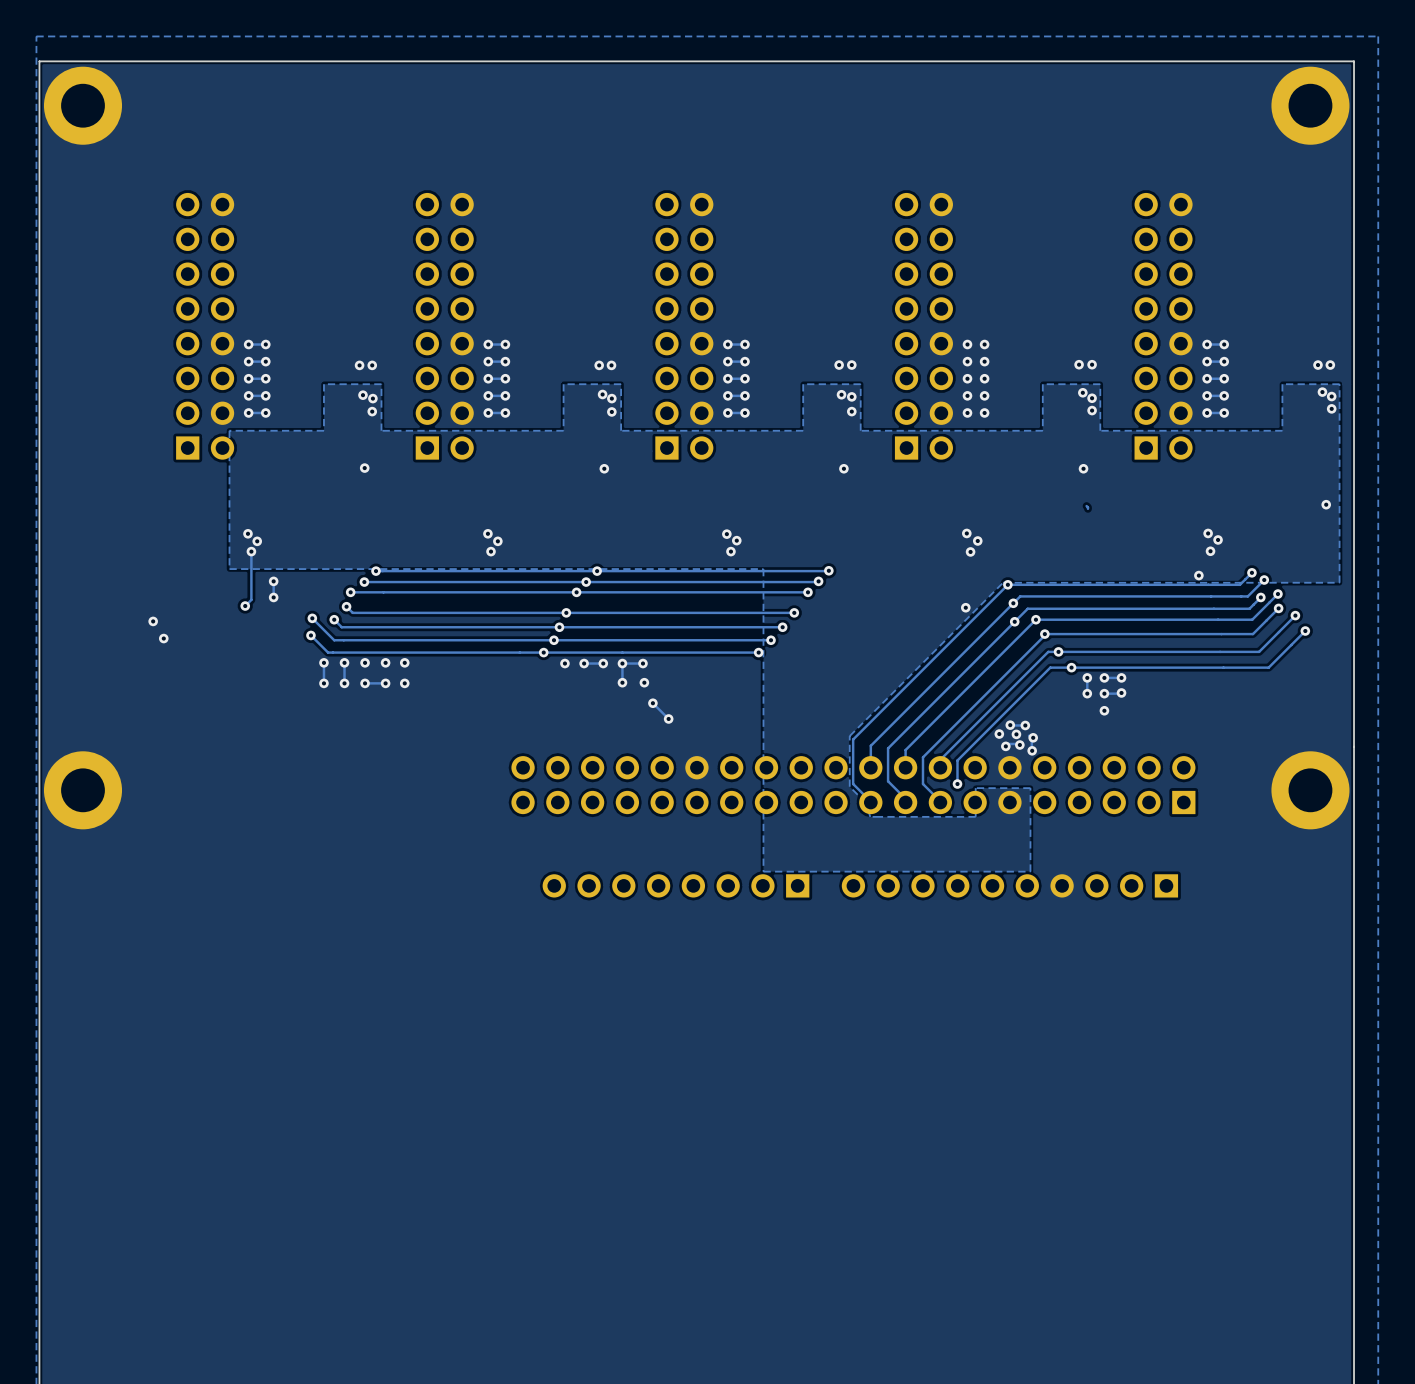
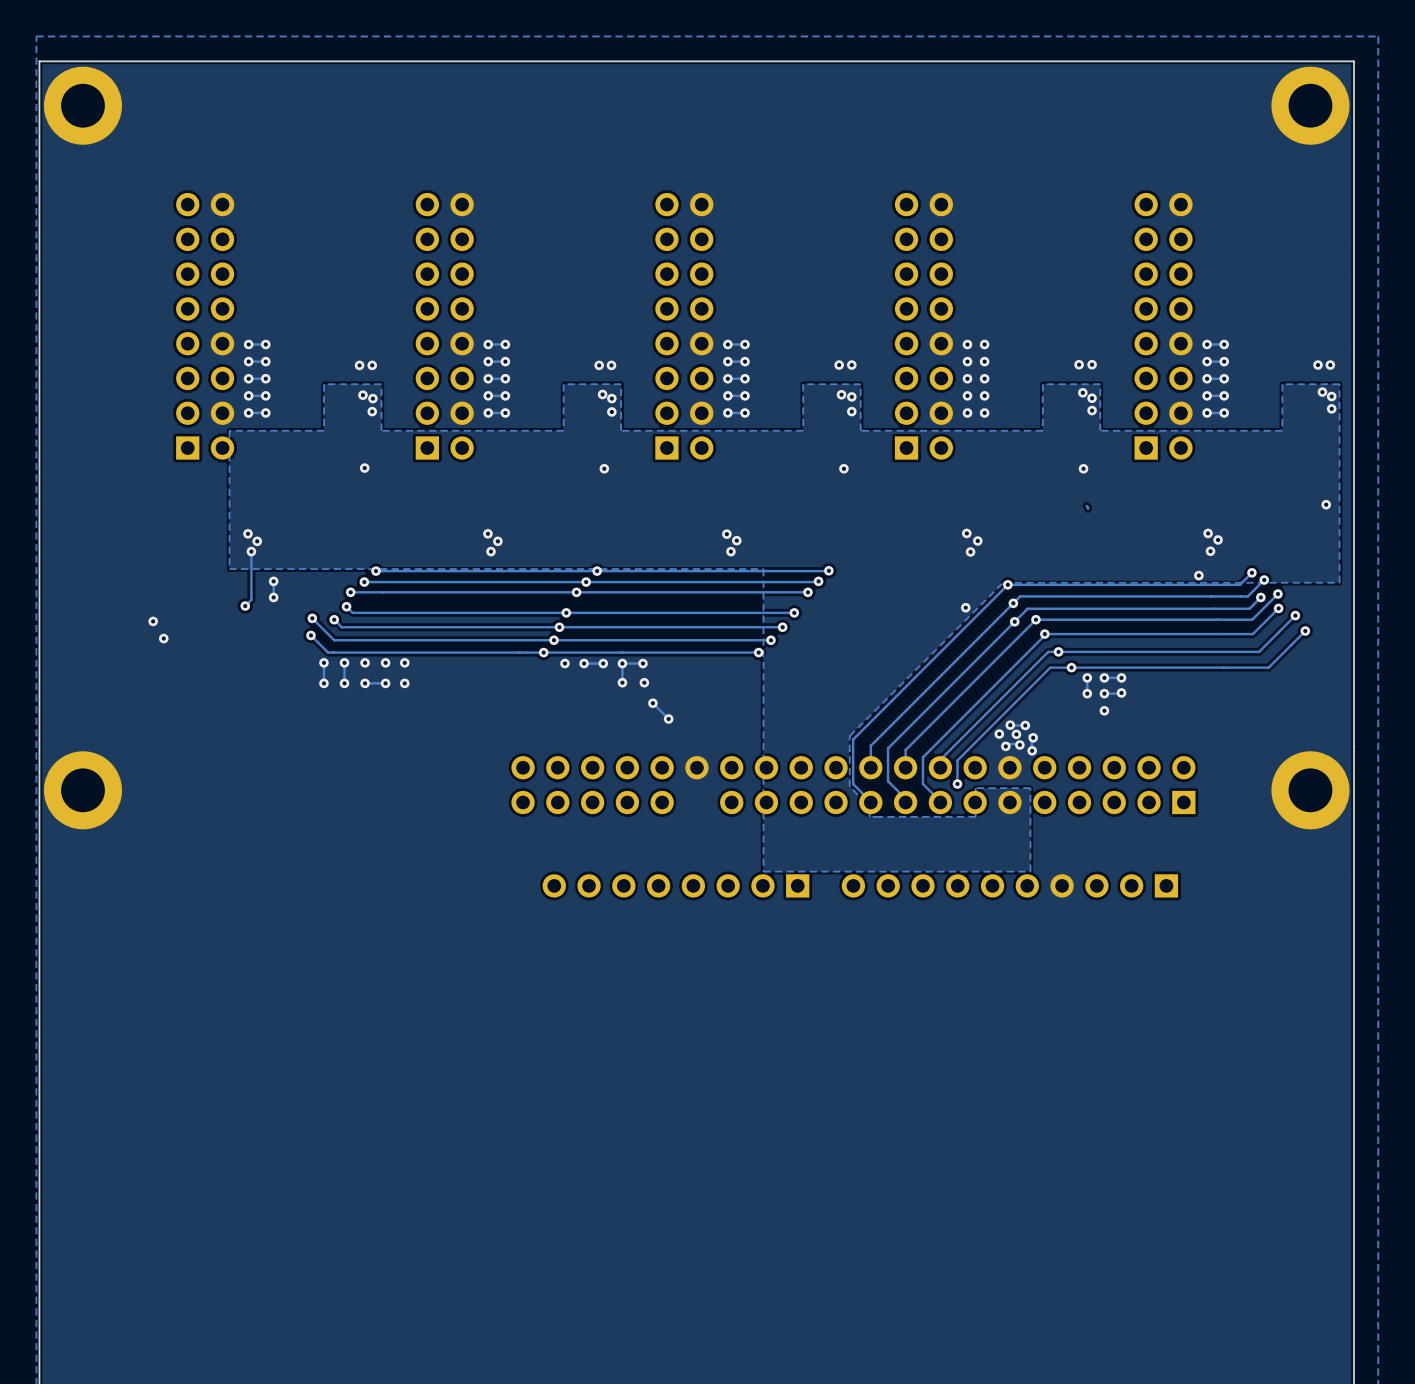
part footprint: [511, 756, 1196, 815] -> [511, 756, 1196, 815]

